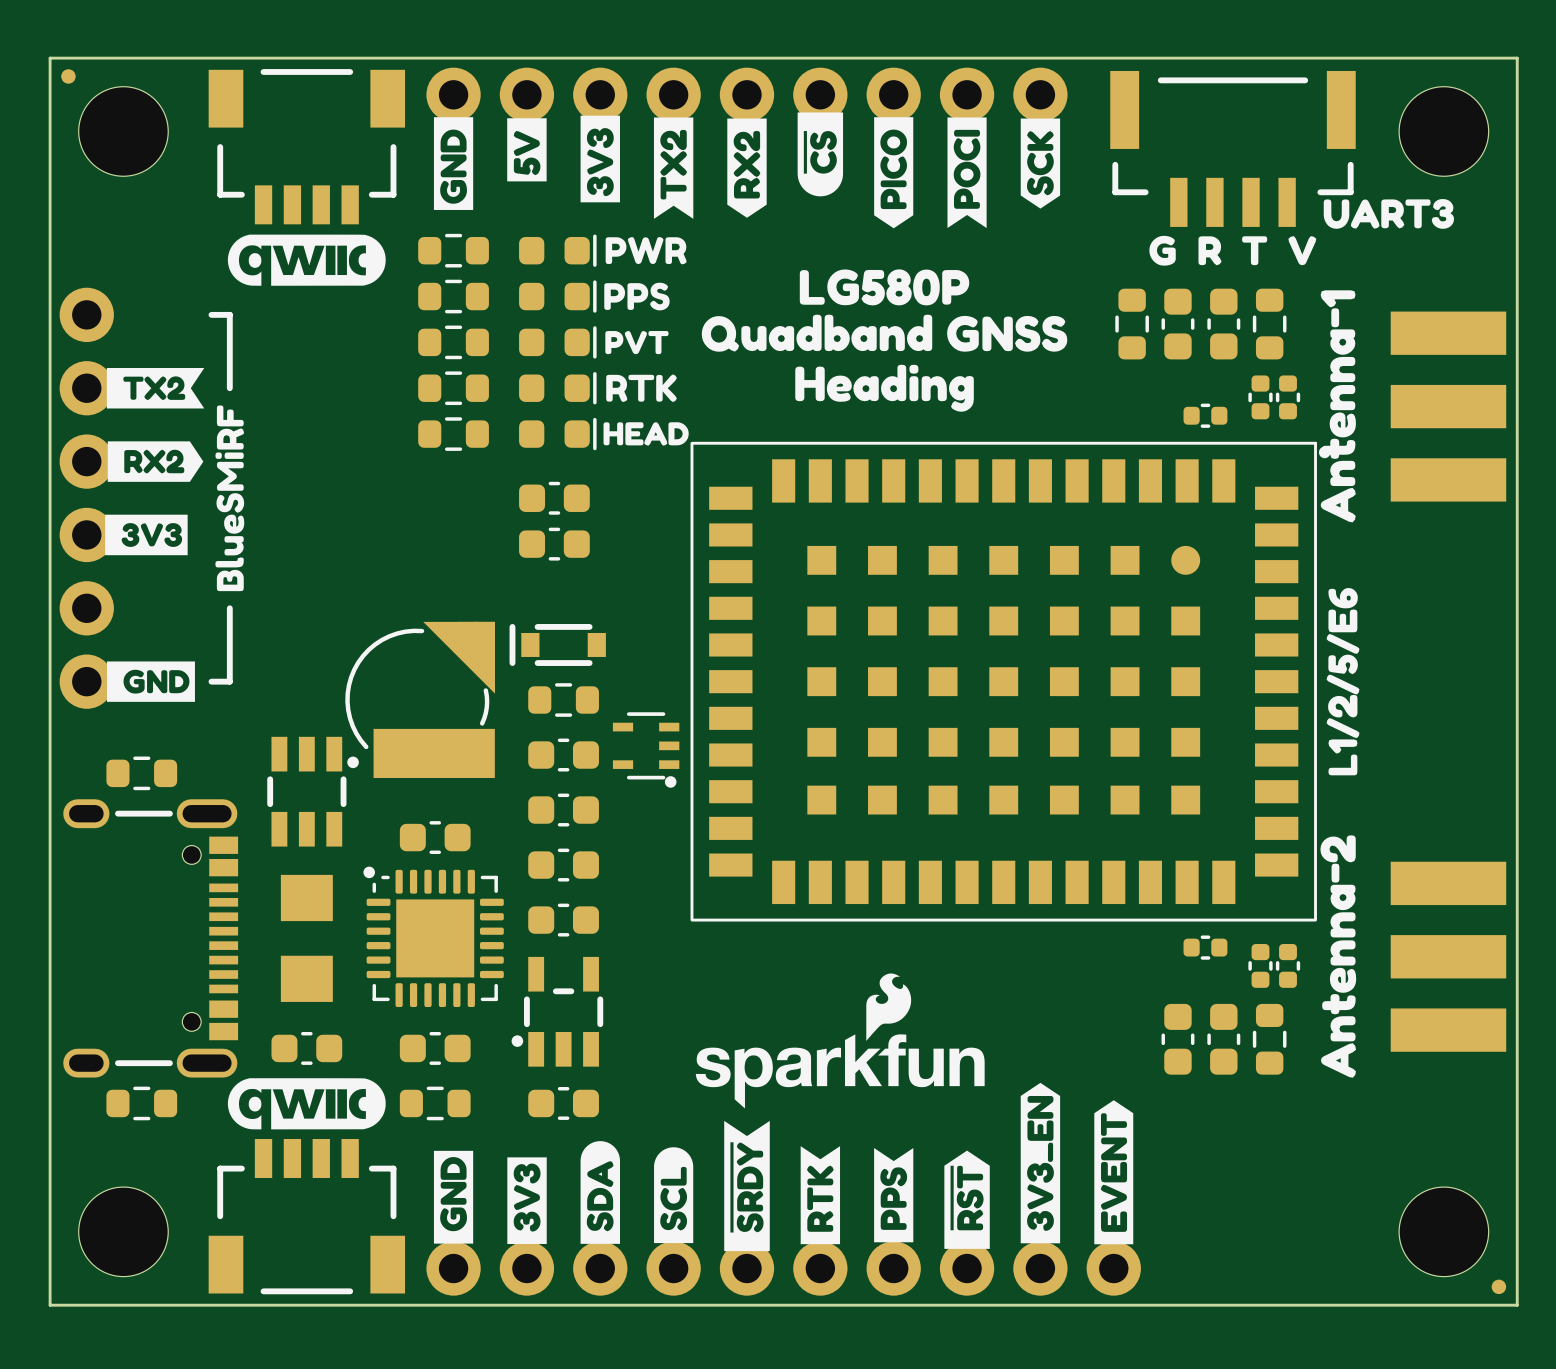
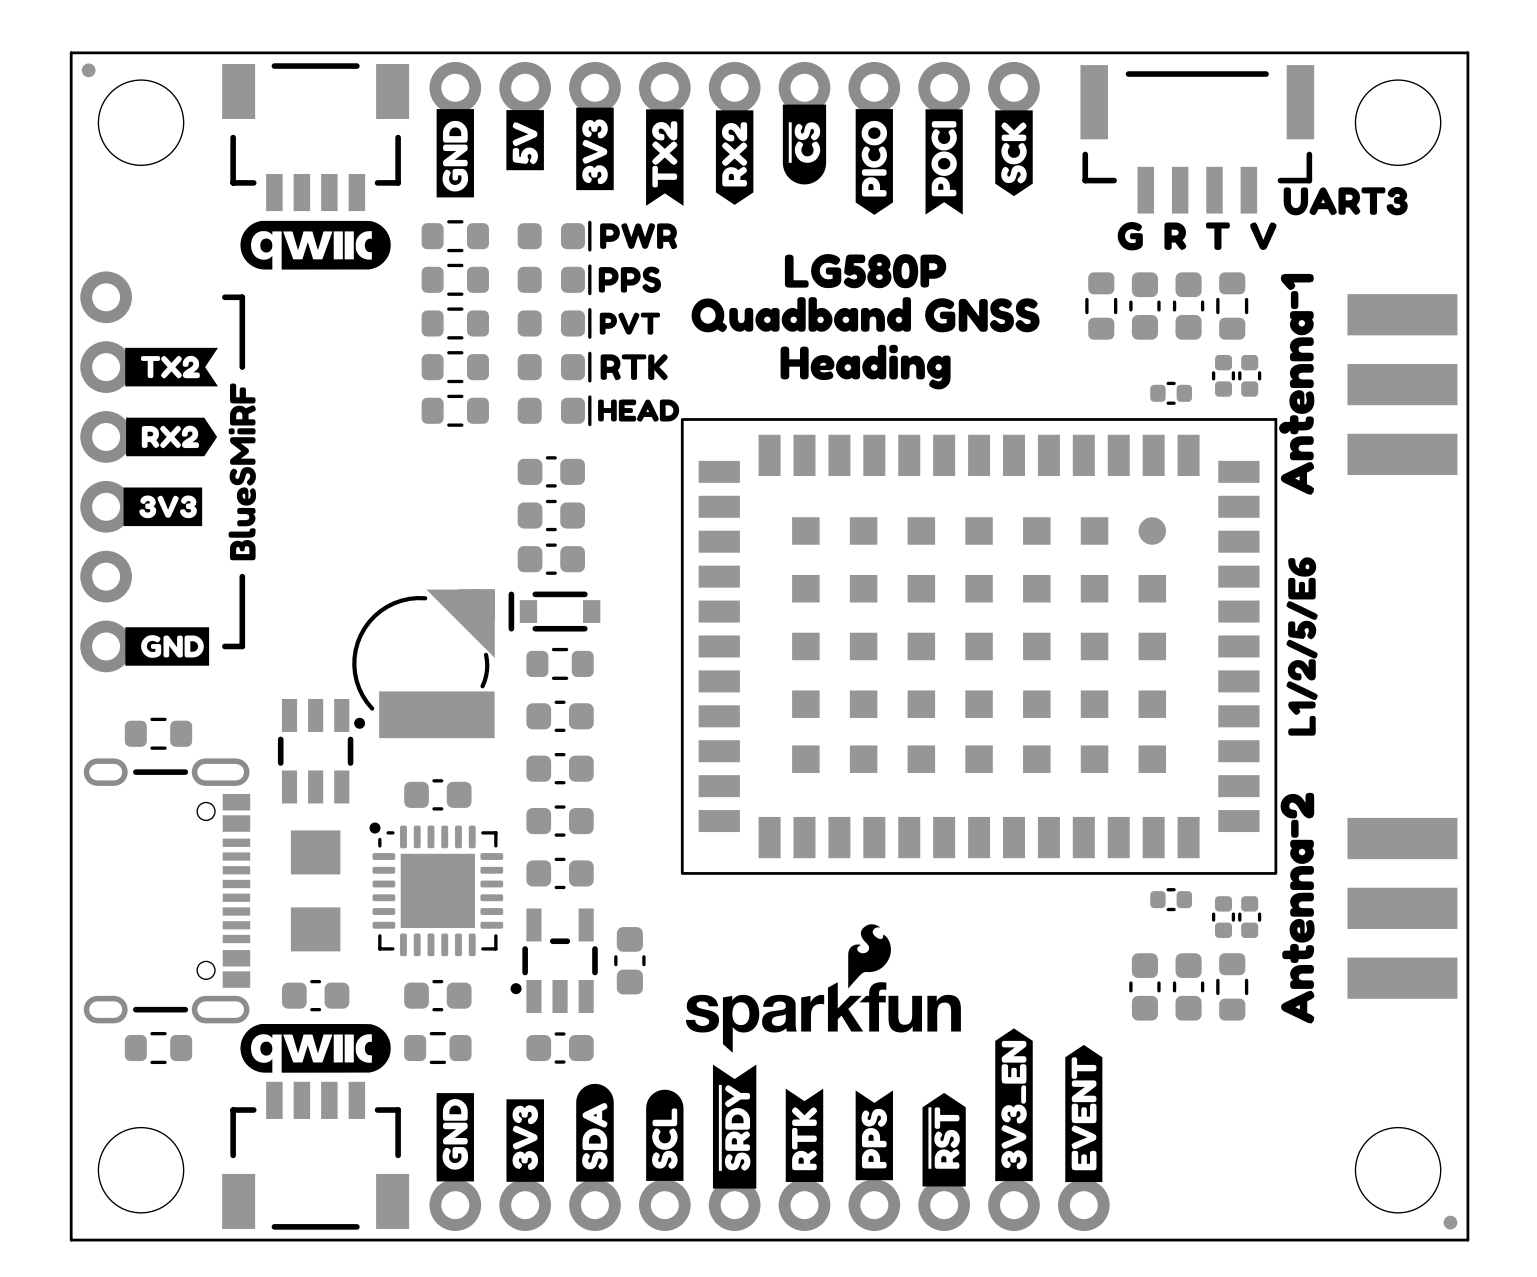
part: none -> (551, 559)
part: (646, 749) -> none
part: none -> (629, 960)

